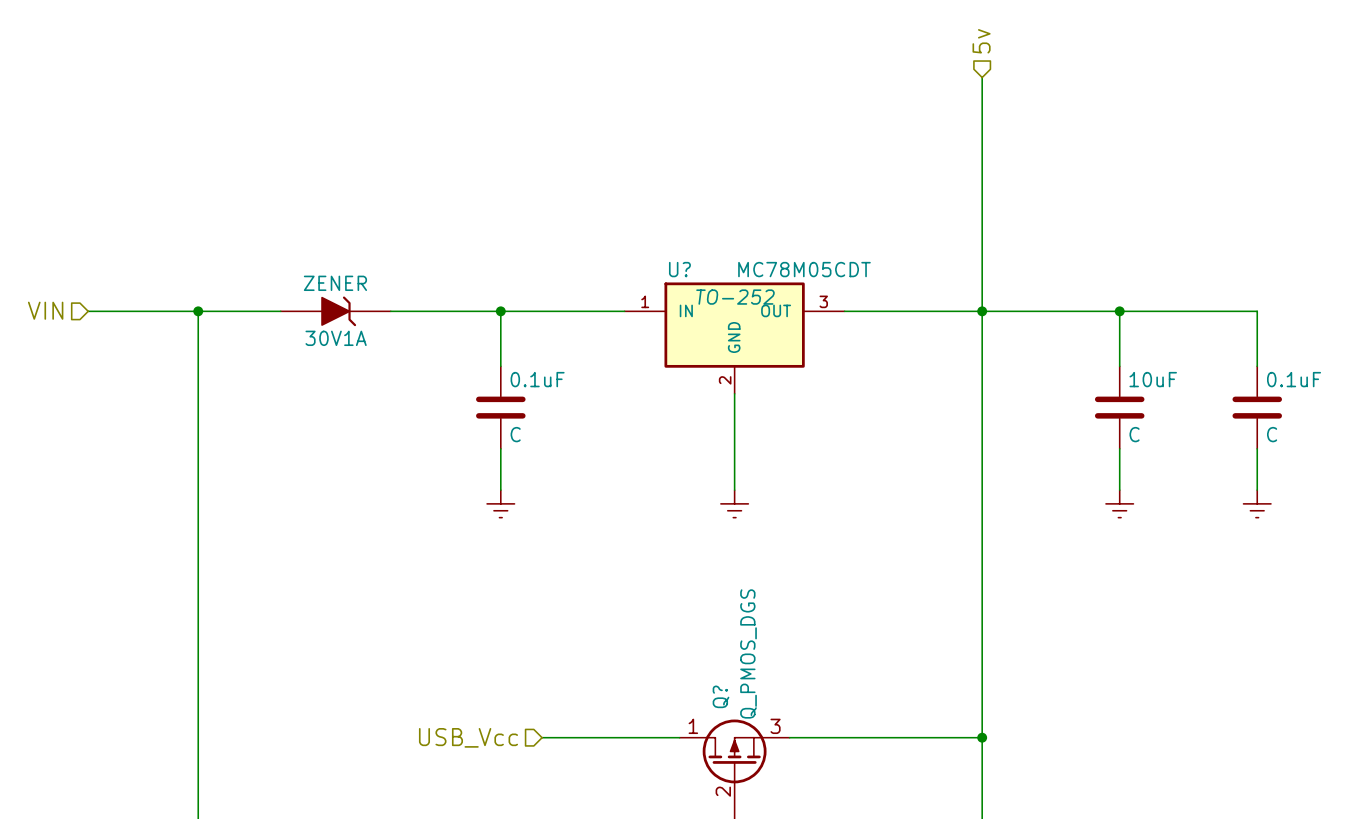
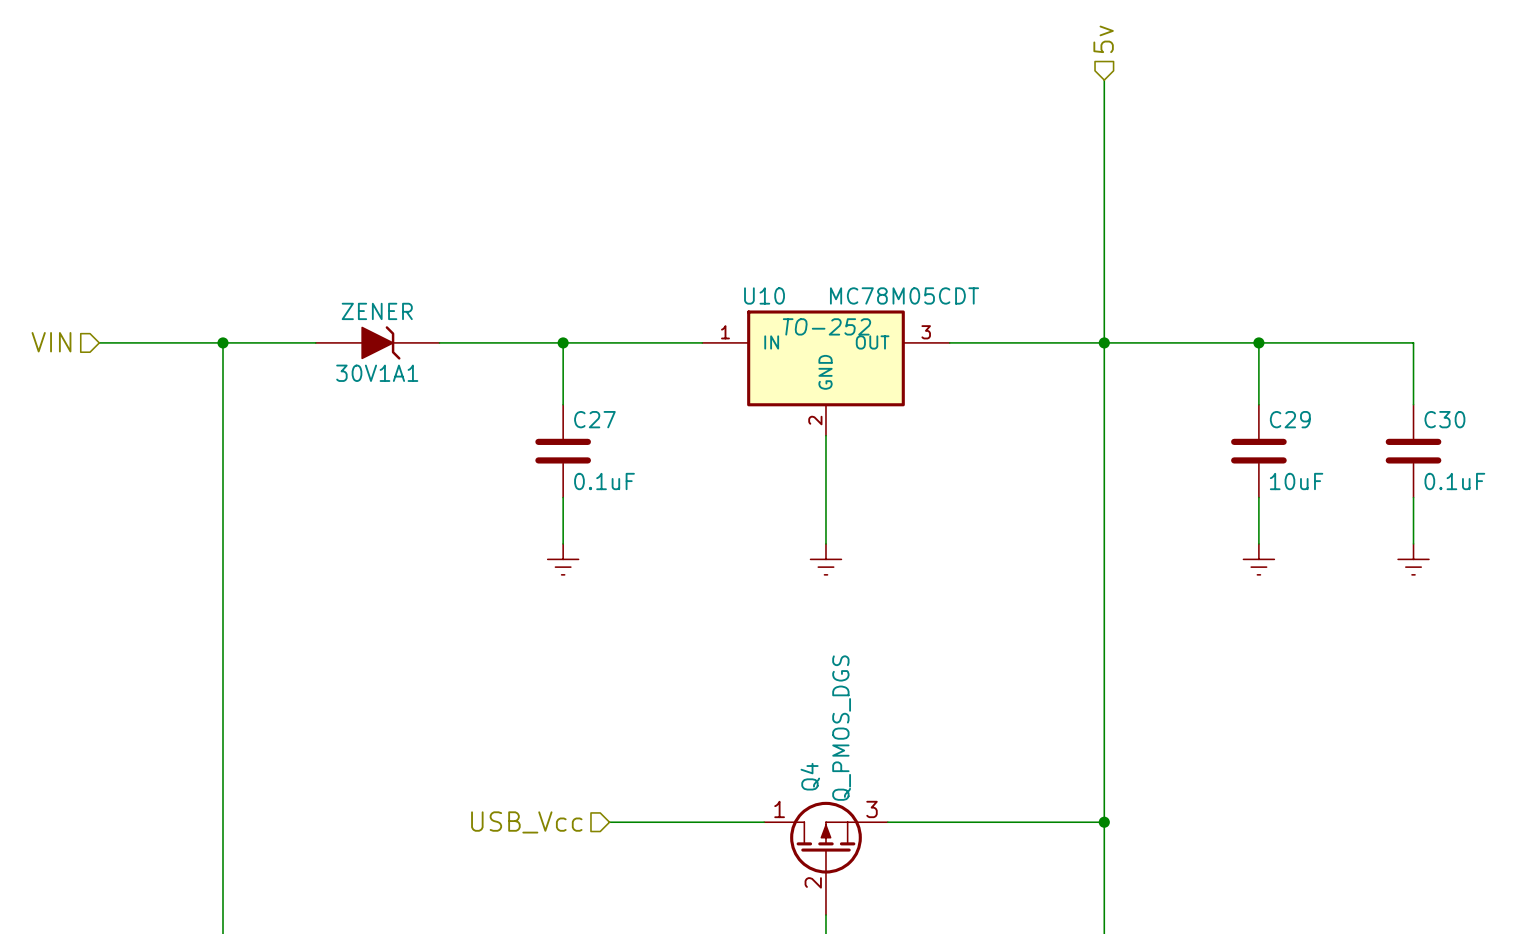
U? name: U? (679, 269) -> U10 (764, 295)
30V1A name: 30V1A (336, 338) -> 30V1A1 (377, 373)
0.1uF name: 0.1uF (537, 379) -> C27 (594, 419)
10uF name: 10uF (1153, 379) -> C29 (1290, 419)
0.1uF name: 0.1uF (1294, 379) -> C30 (1444, 419)
0.1uF value: C (515, 434) -> 0.1uF (604, 481)
10uF value: C (1134, 434) -> 10uF (1296, 481)
0.1uF value: C (1272, 434) -> 0.1uF (1454, 481)
Q? name: Q? (721, 696) -> Q4 (810, 776)

